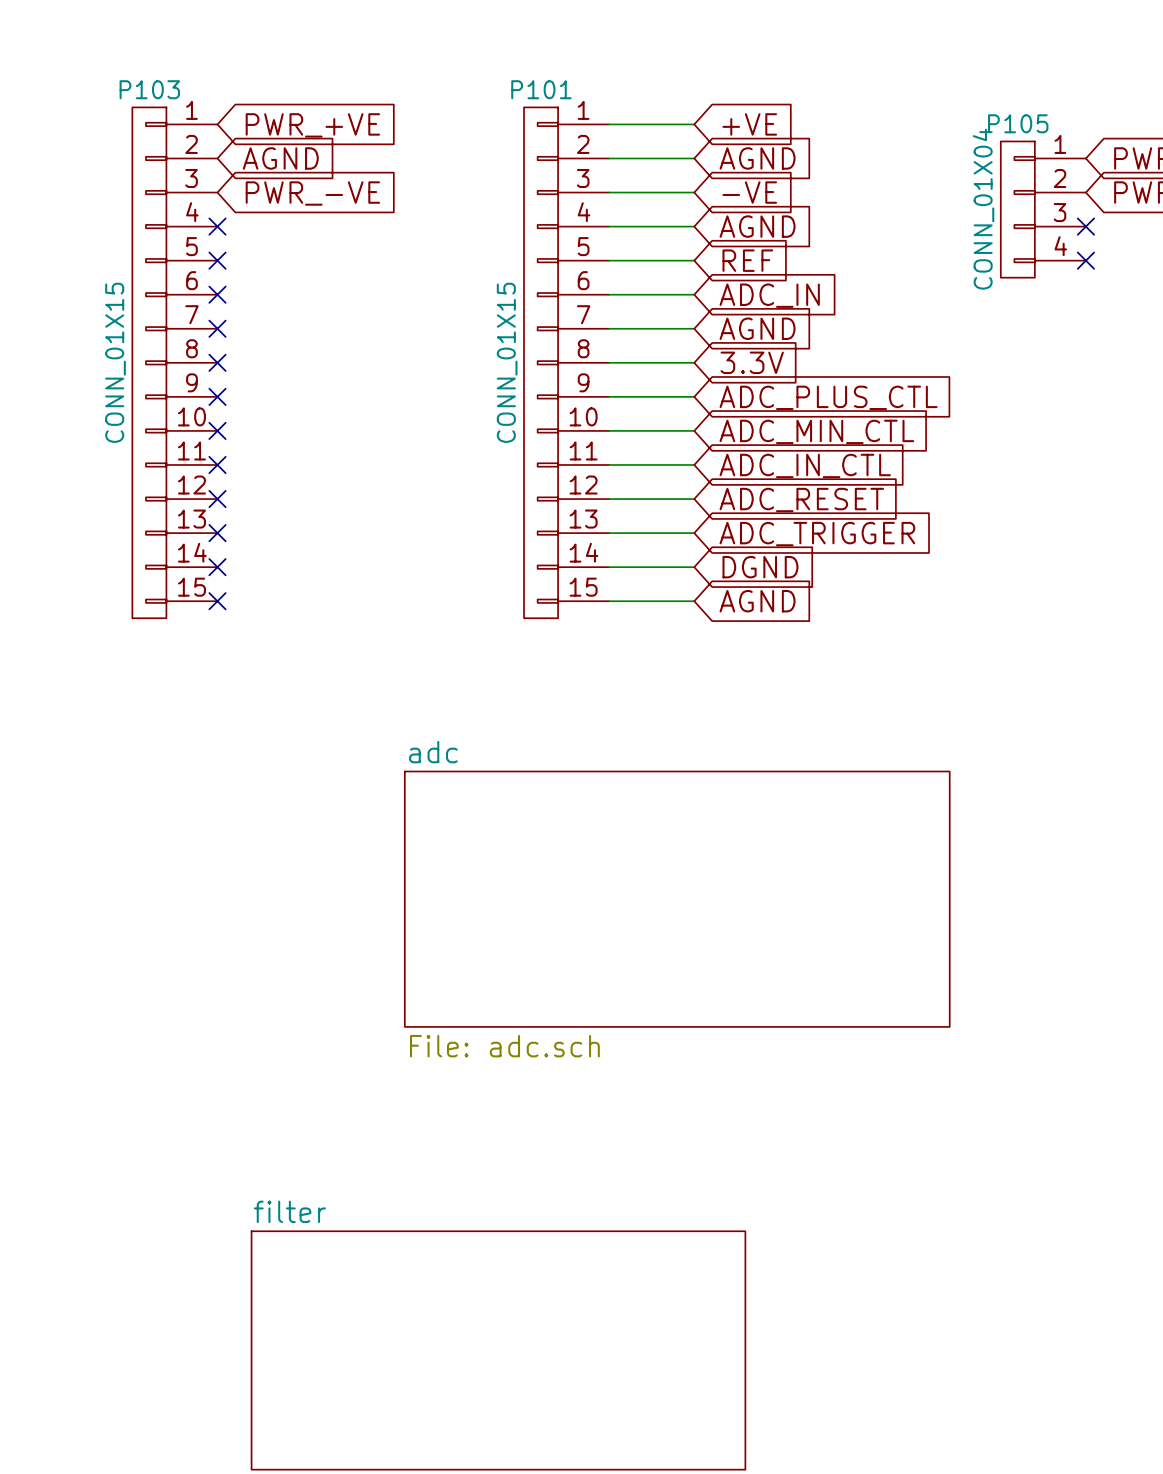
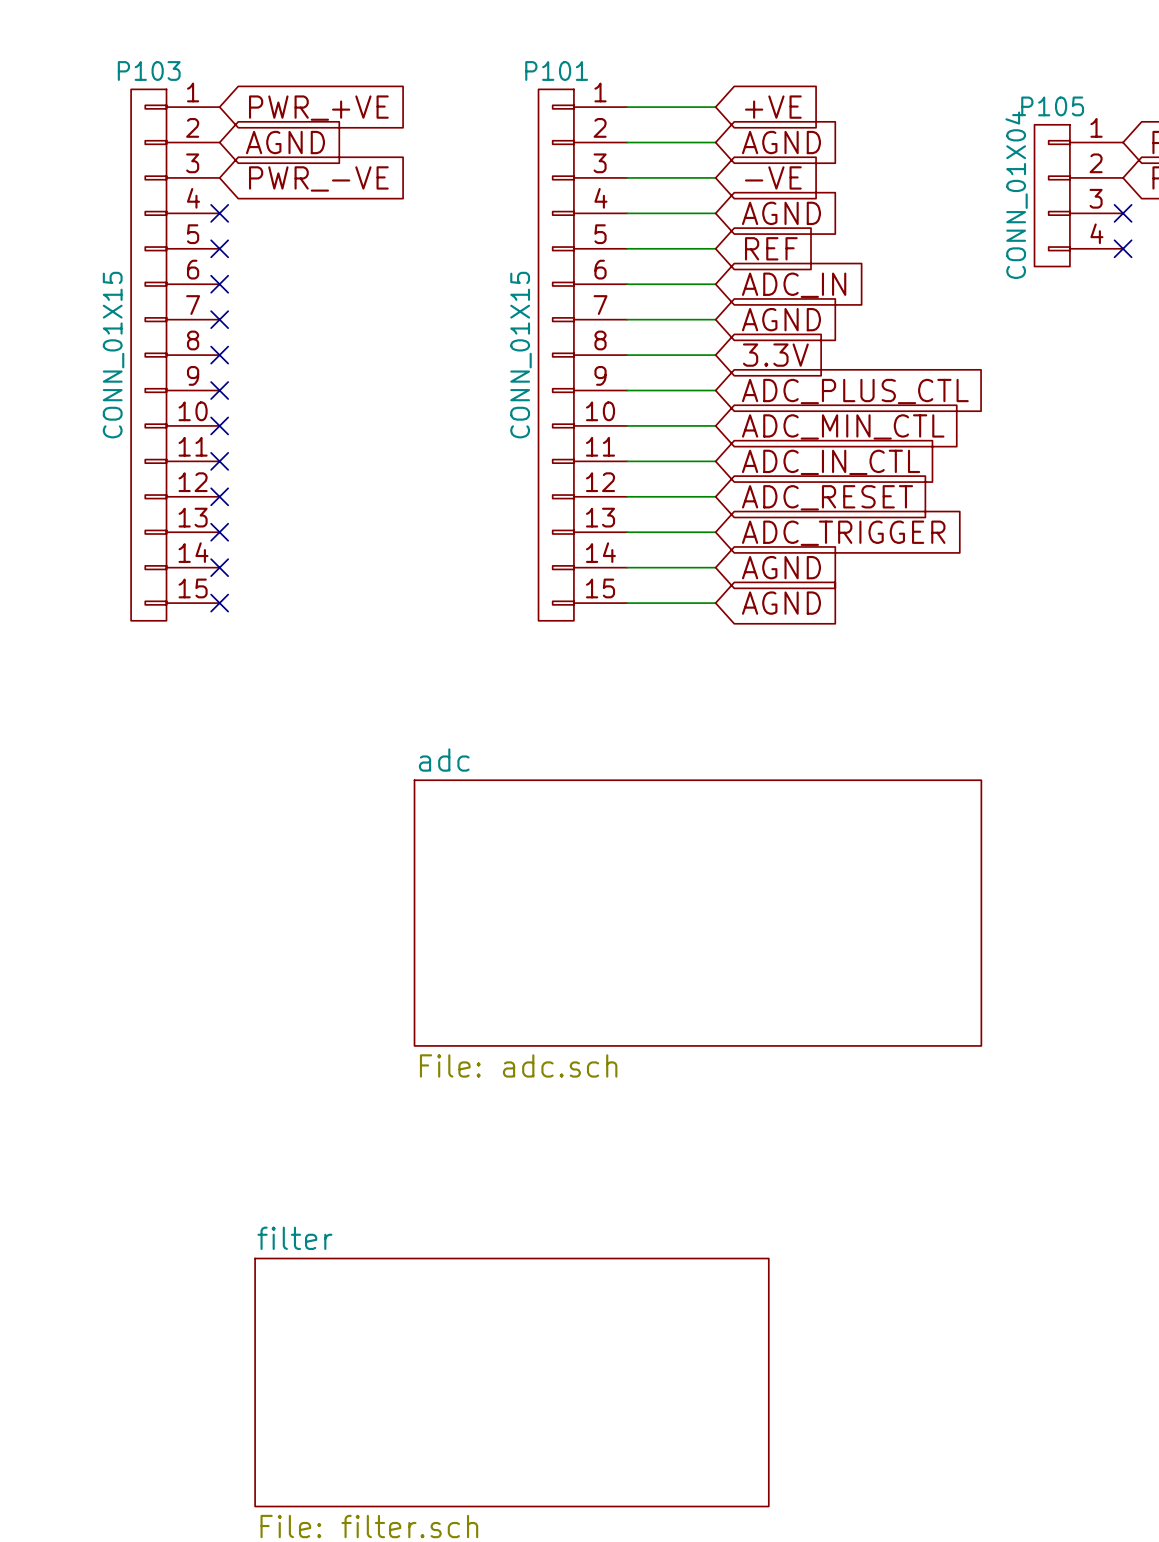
global label: DGND (760, 567) -> AGND (781, 567)

